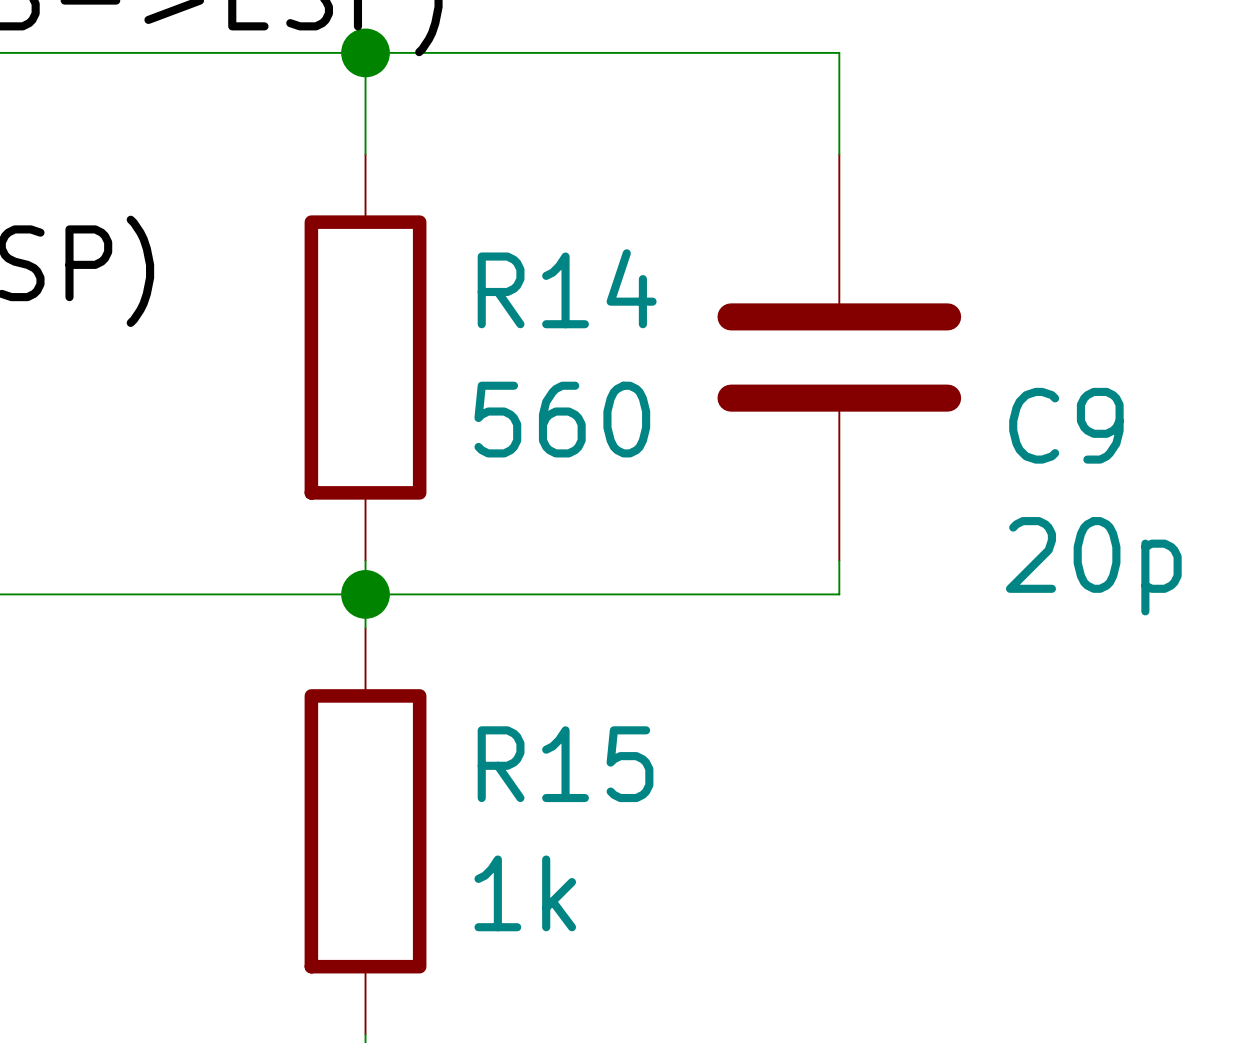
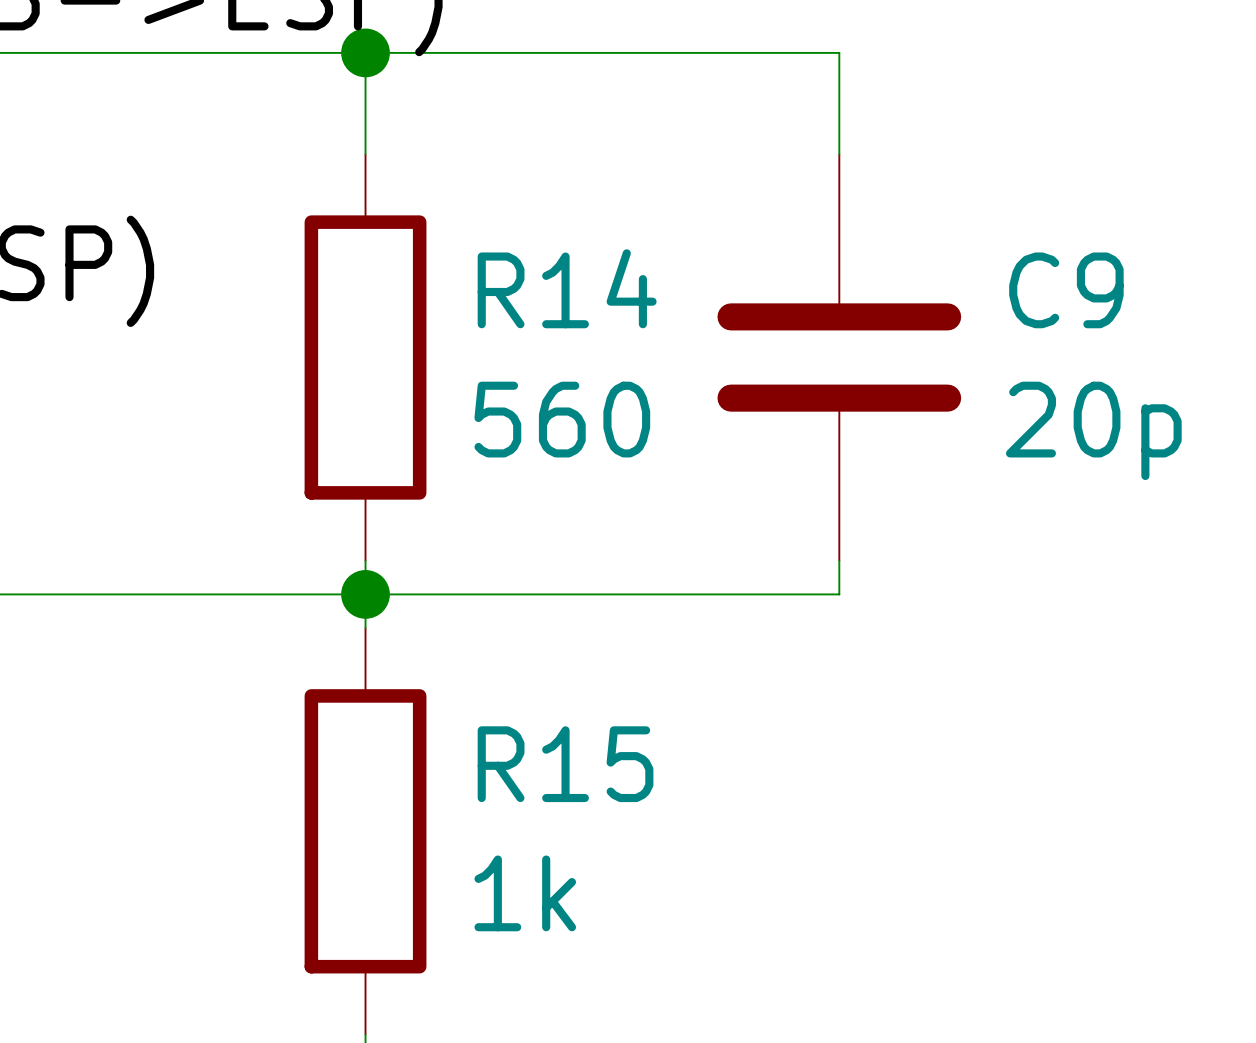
C9 name position: C9 (1066, 425) -> C9 (1066, 290)
C9 value position: 20p (1093, 566) -> 20p (1093, 430)

